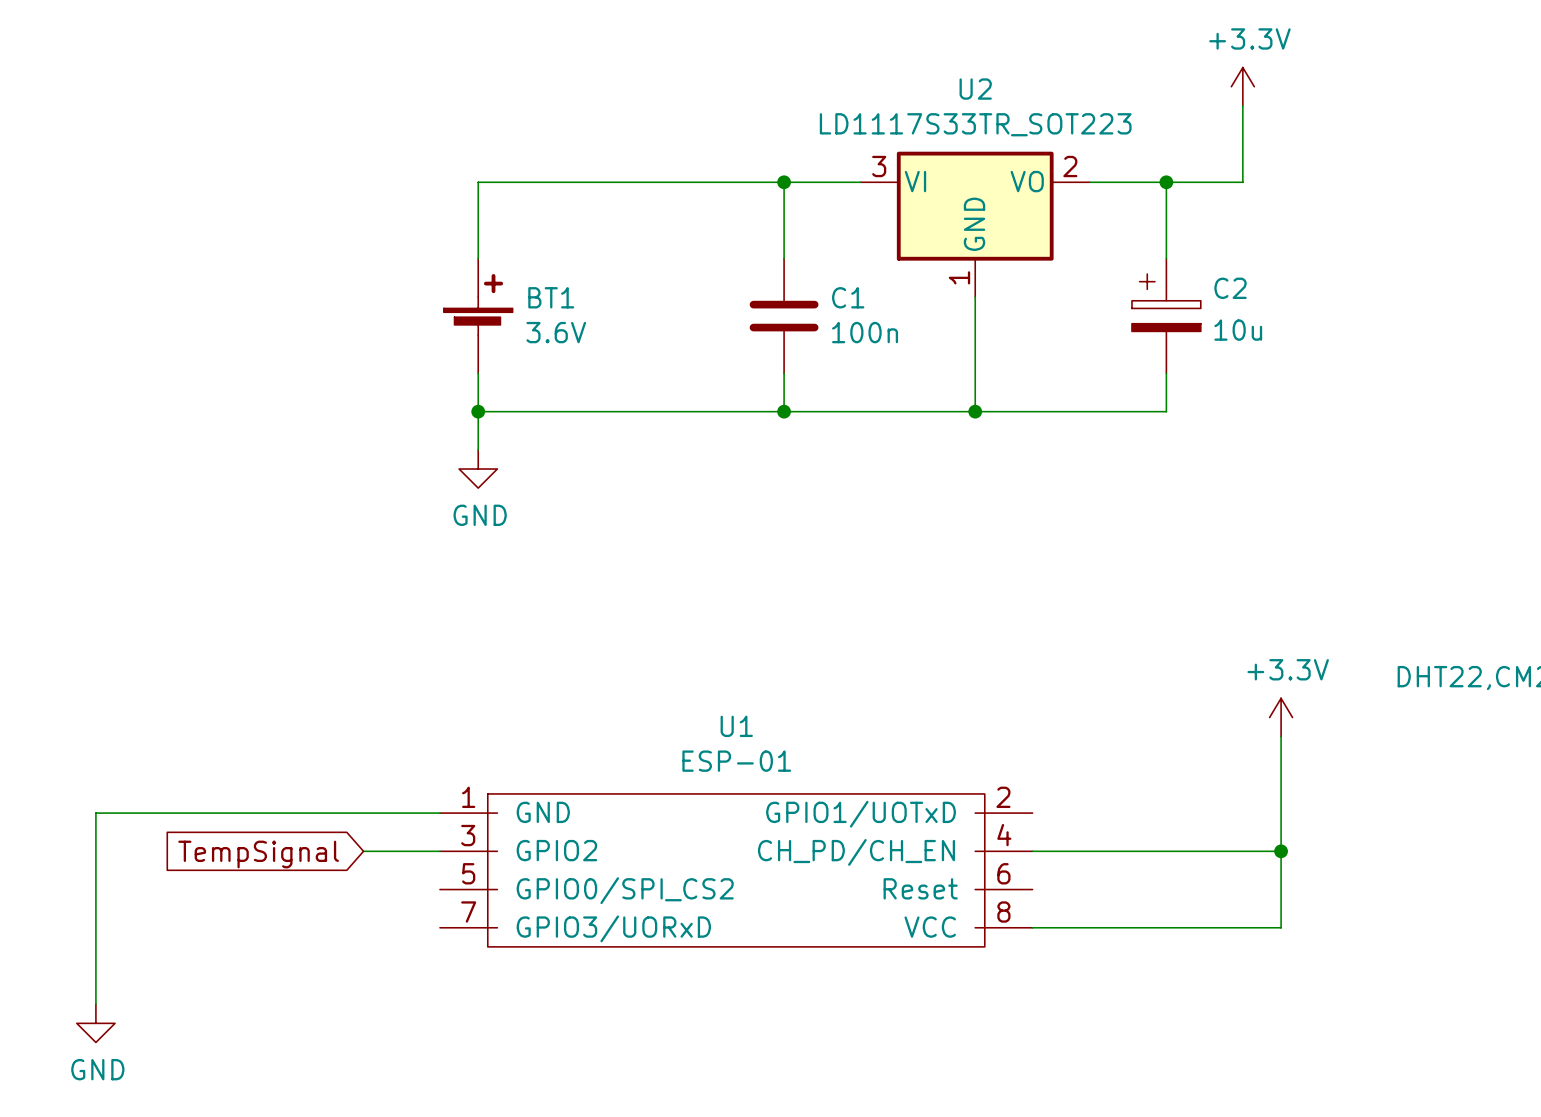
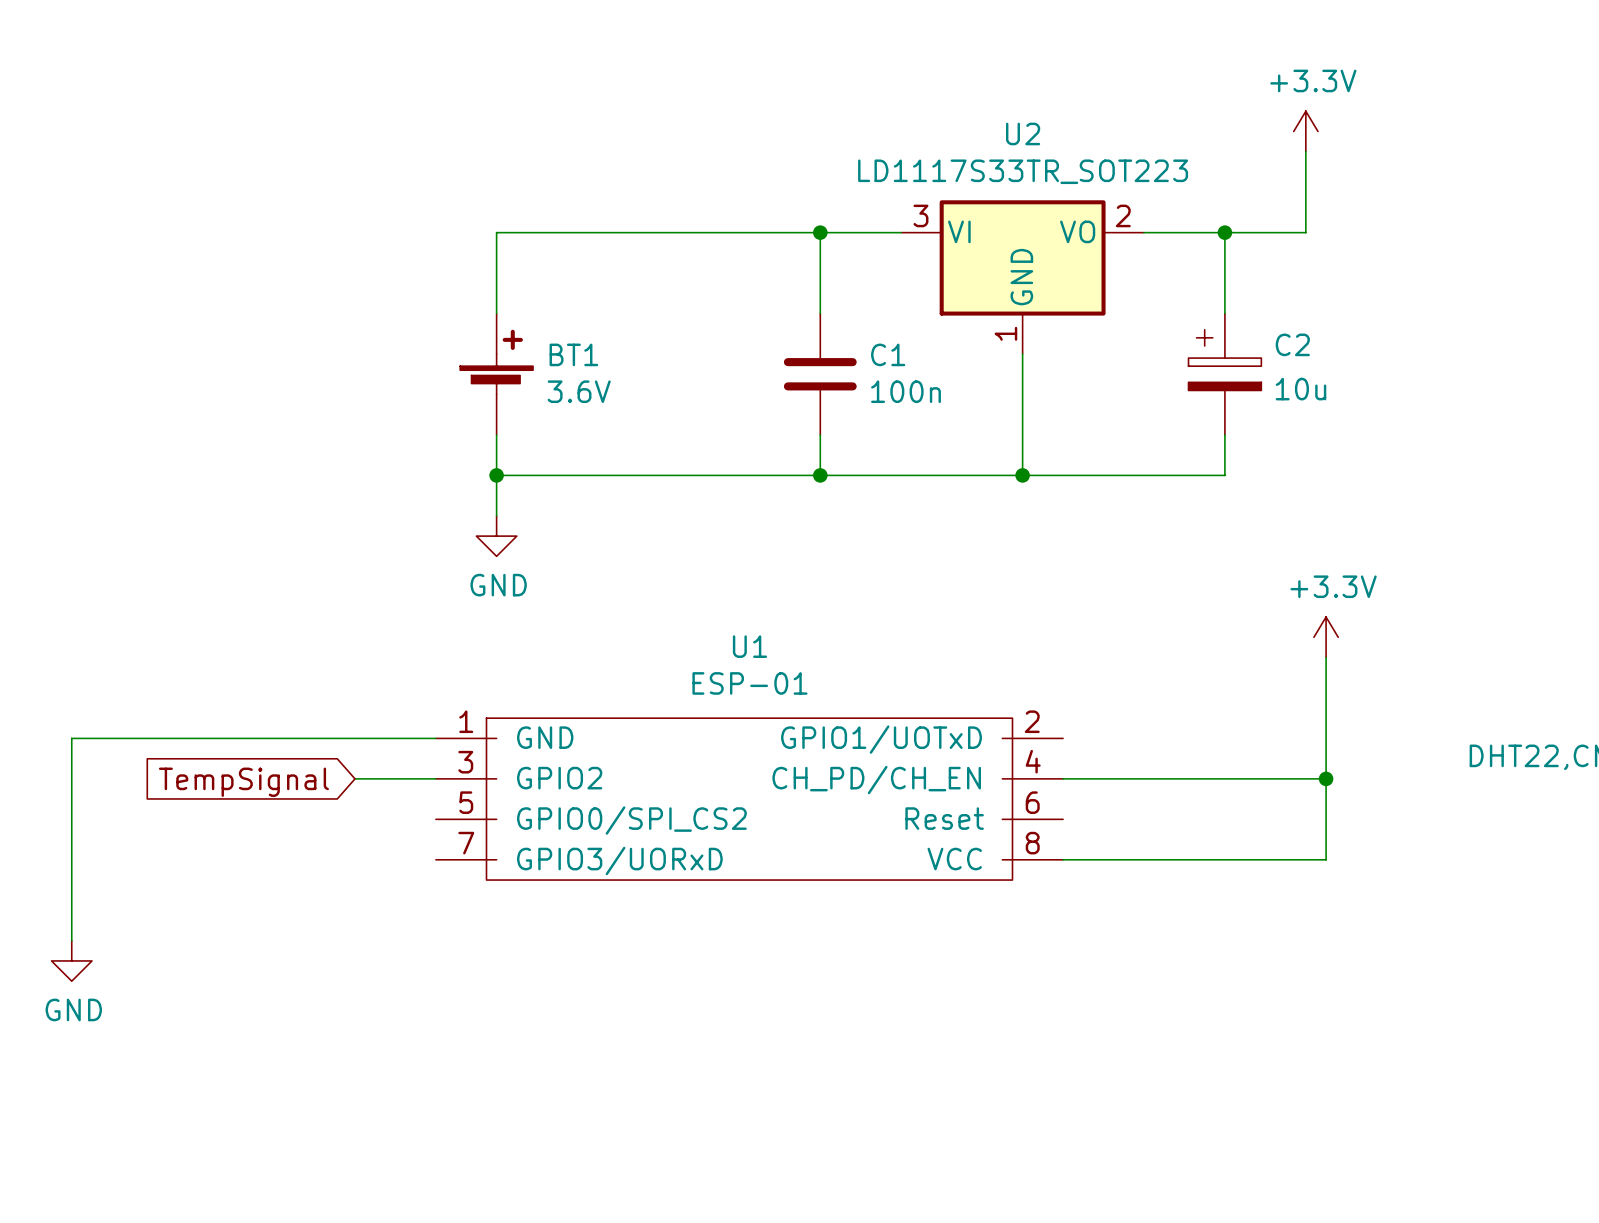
junction: none -> (1326, 778)
power symbol position: +3.3V (1281, 717) -> +3.3V (1326, 637)
wire: (1281, 736) (1281, 927) (1032, 927) -> (1326, 657) (1326, 859) (1063, 859)
wire: (440, 813) (95, 813) (95, 1004) -> (435, 738) (71, 738) (71, 940)
wire: (363, 851) (440, 851) -> (354, 778) (435, 778)
wire: (1032, 851) (1281, 851) -> (1063, 778) (1326, 778)
junction: (1281, 851) -> none
global label position: TempSignal (258, 854) -> TempSignal (243, 782)
U1 position: (736, 870) -> (749, 799)
power symbol position: GND (95, 1023) -> GND (71, 960)

